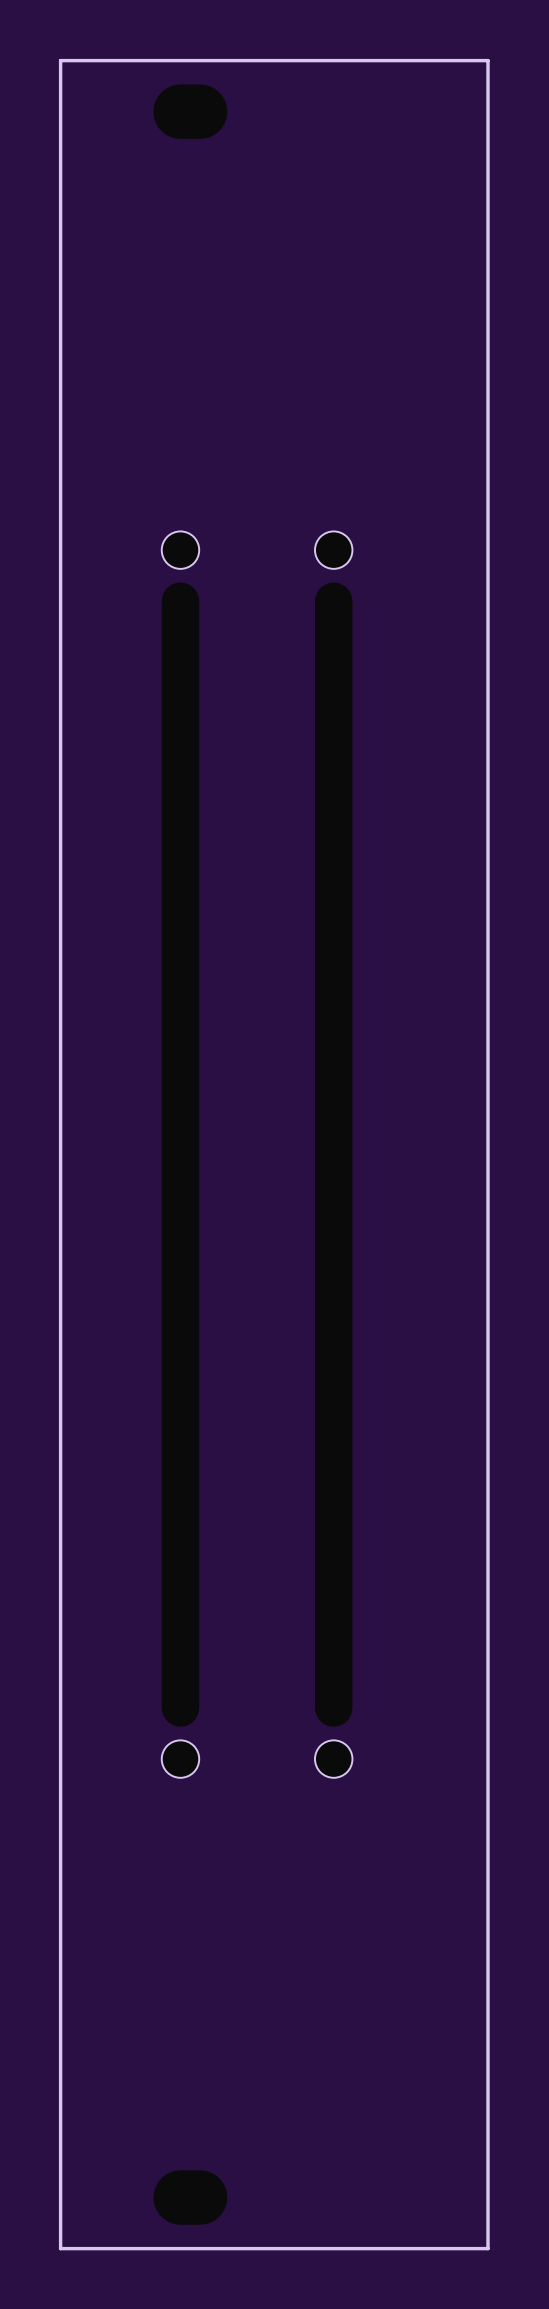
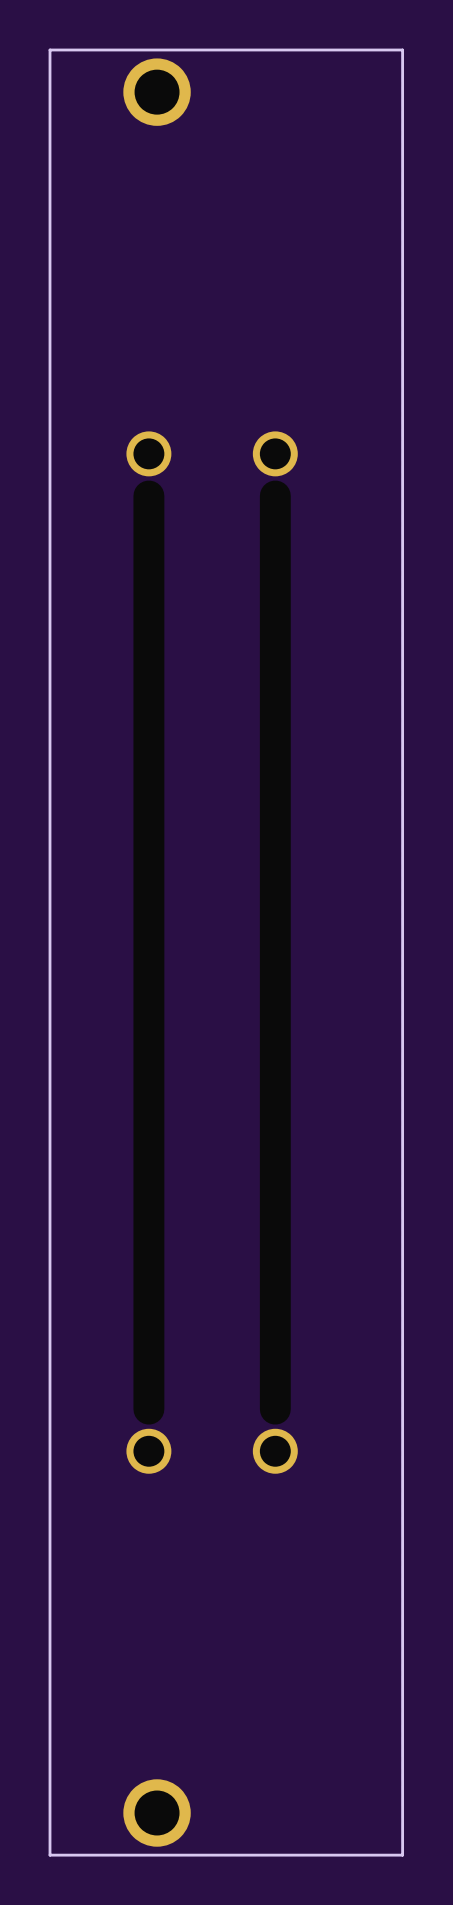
part footprint: [153, 84, 228, 139] -> [123, 58, 191, 126]
part footprint: [161, 531, 200, 1778] -> [126, 431, 172, 1474]
part footprint: [314, 531, 353, 1778] -> [252, 431, 298, 1474]
part footprint: [153, 2170, 228, 2225] -> [123, 1779, 191, 1847]

